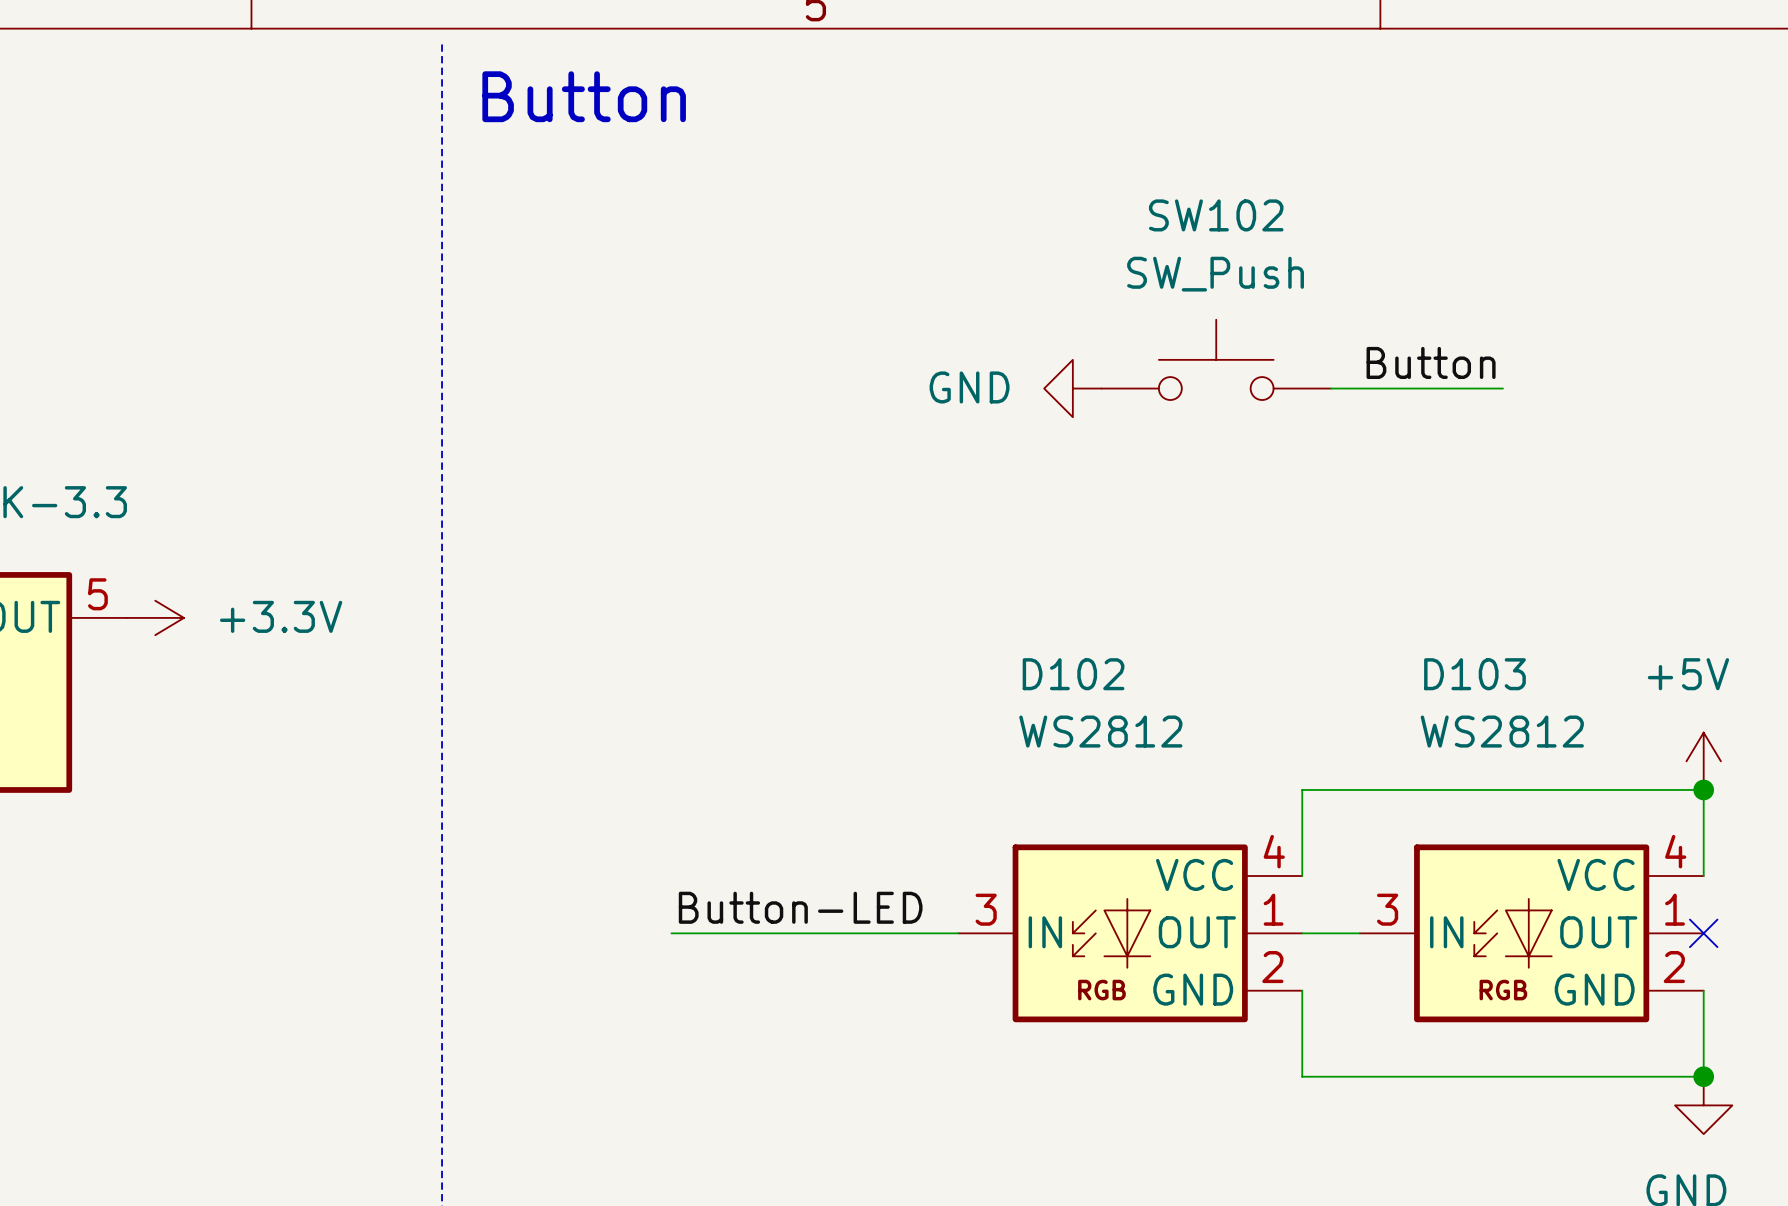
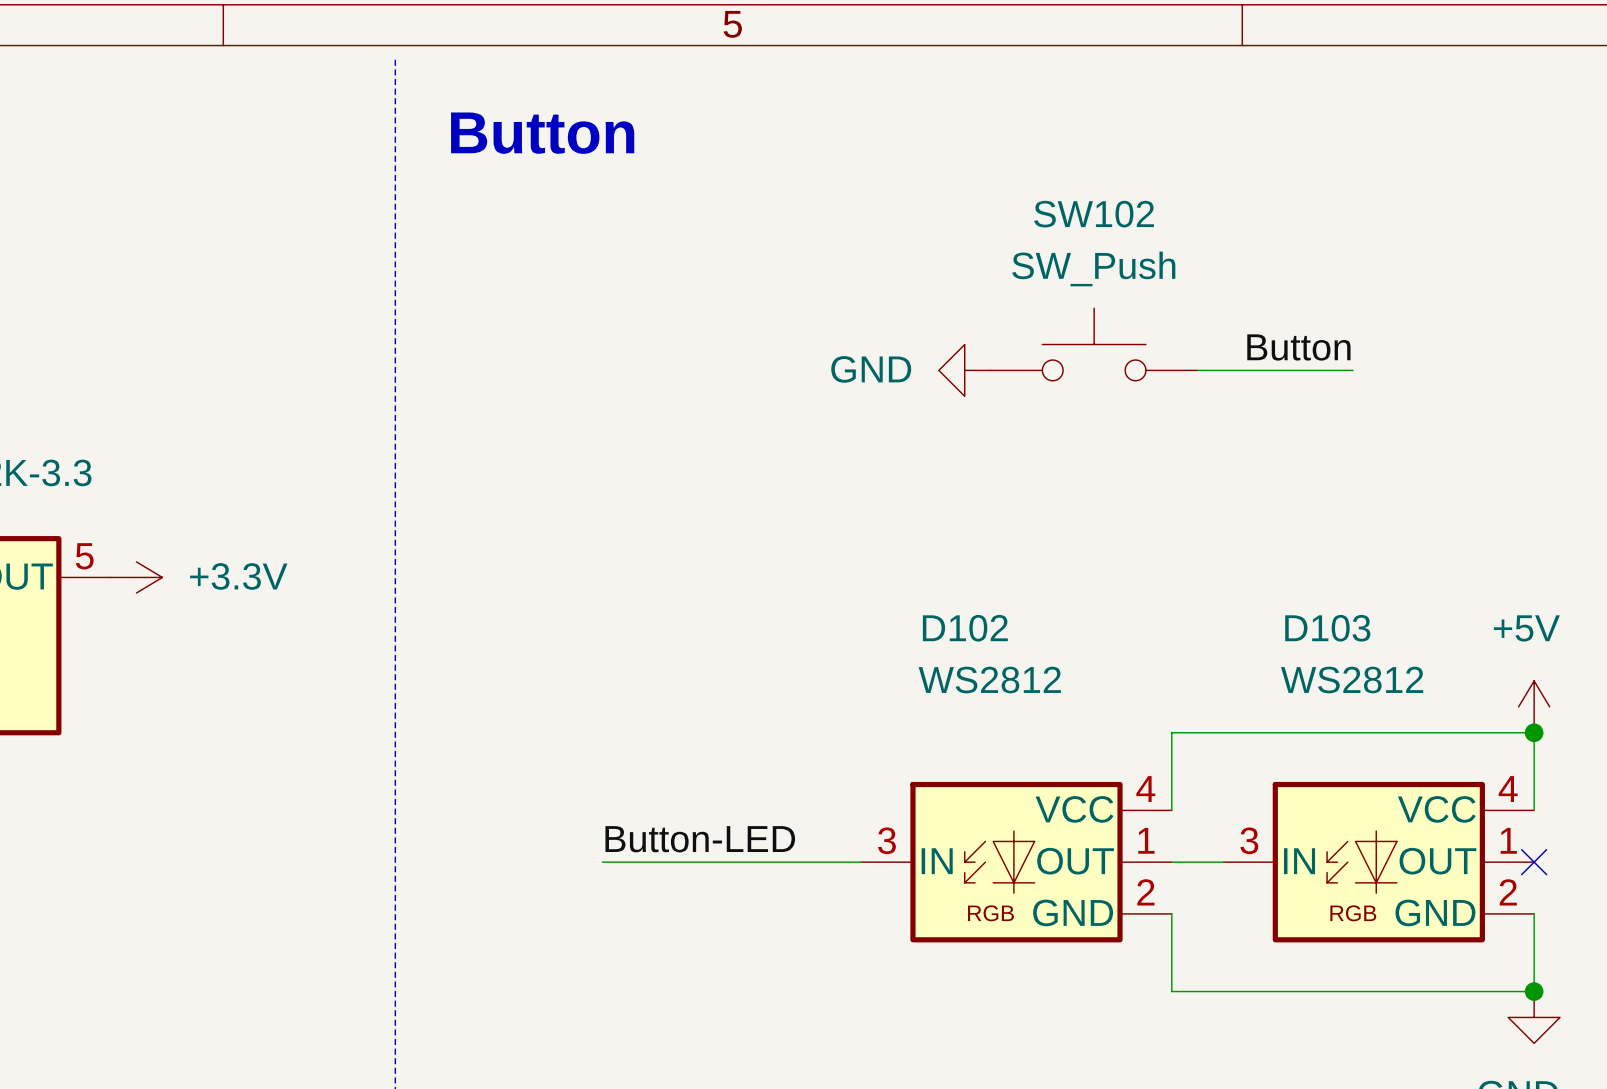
text position: Button (584, 96) -> Button (542, 133)

